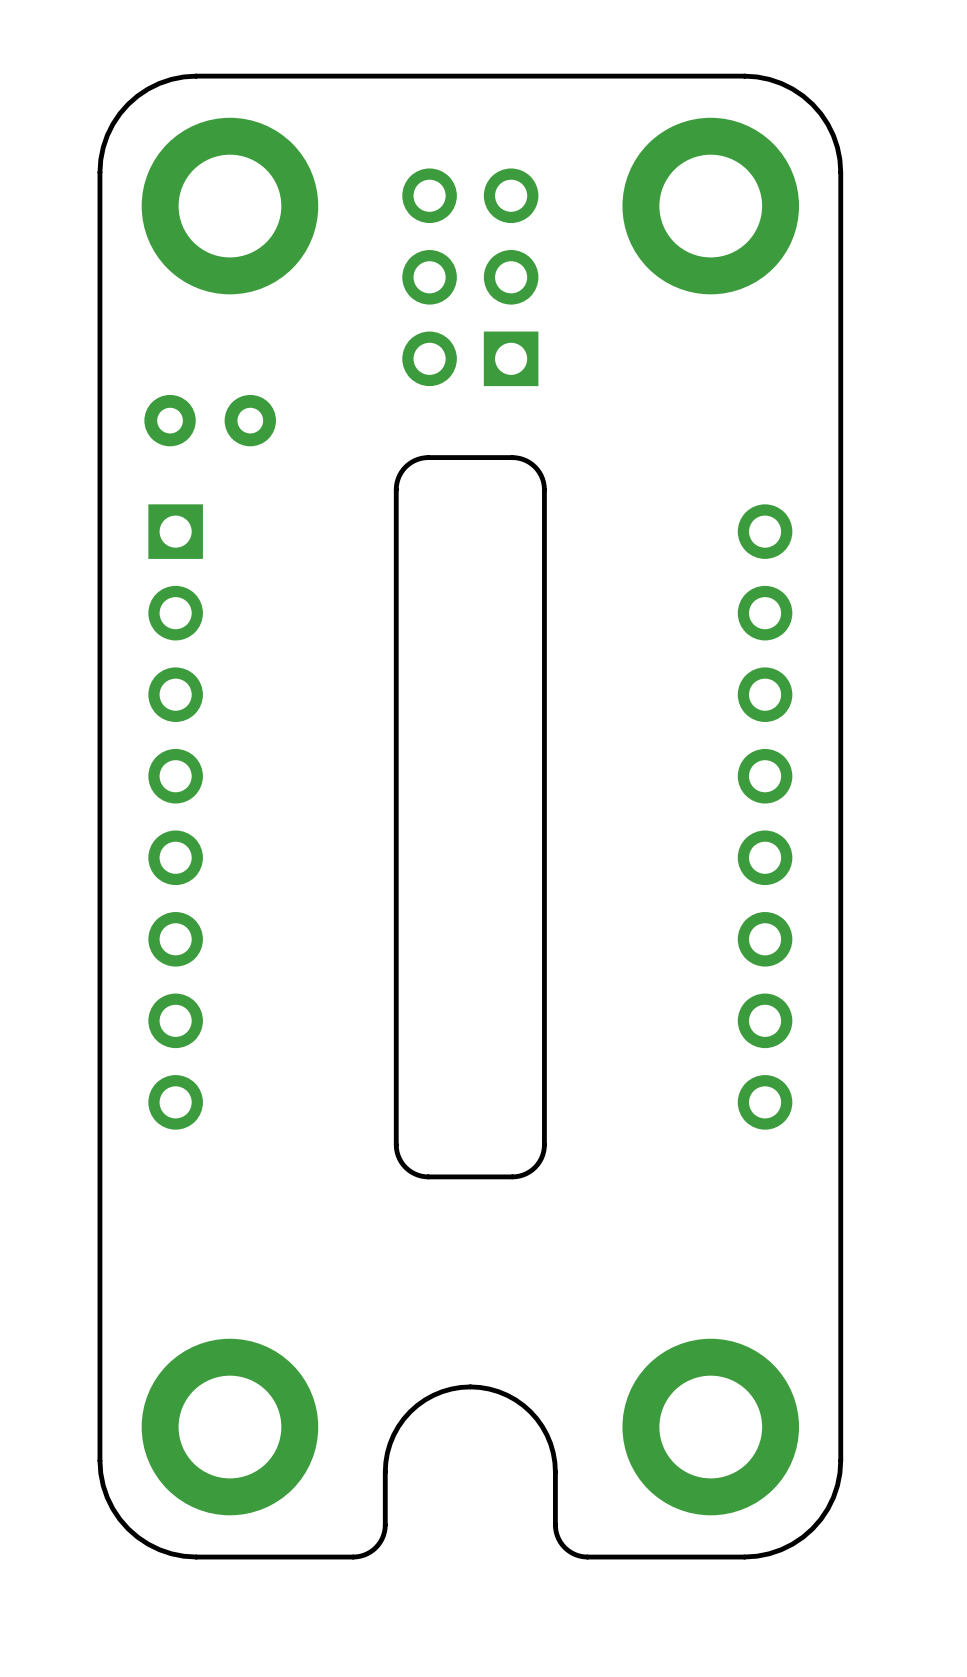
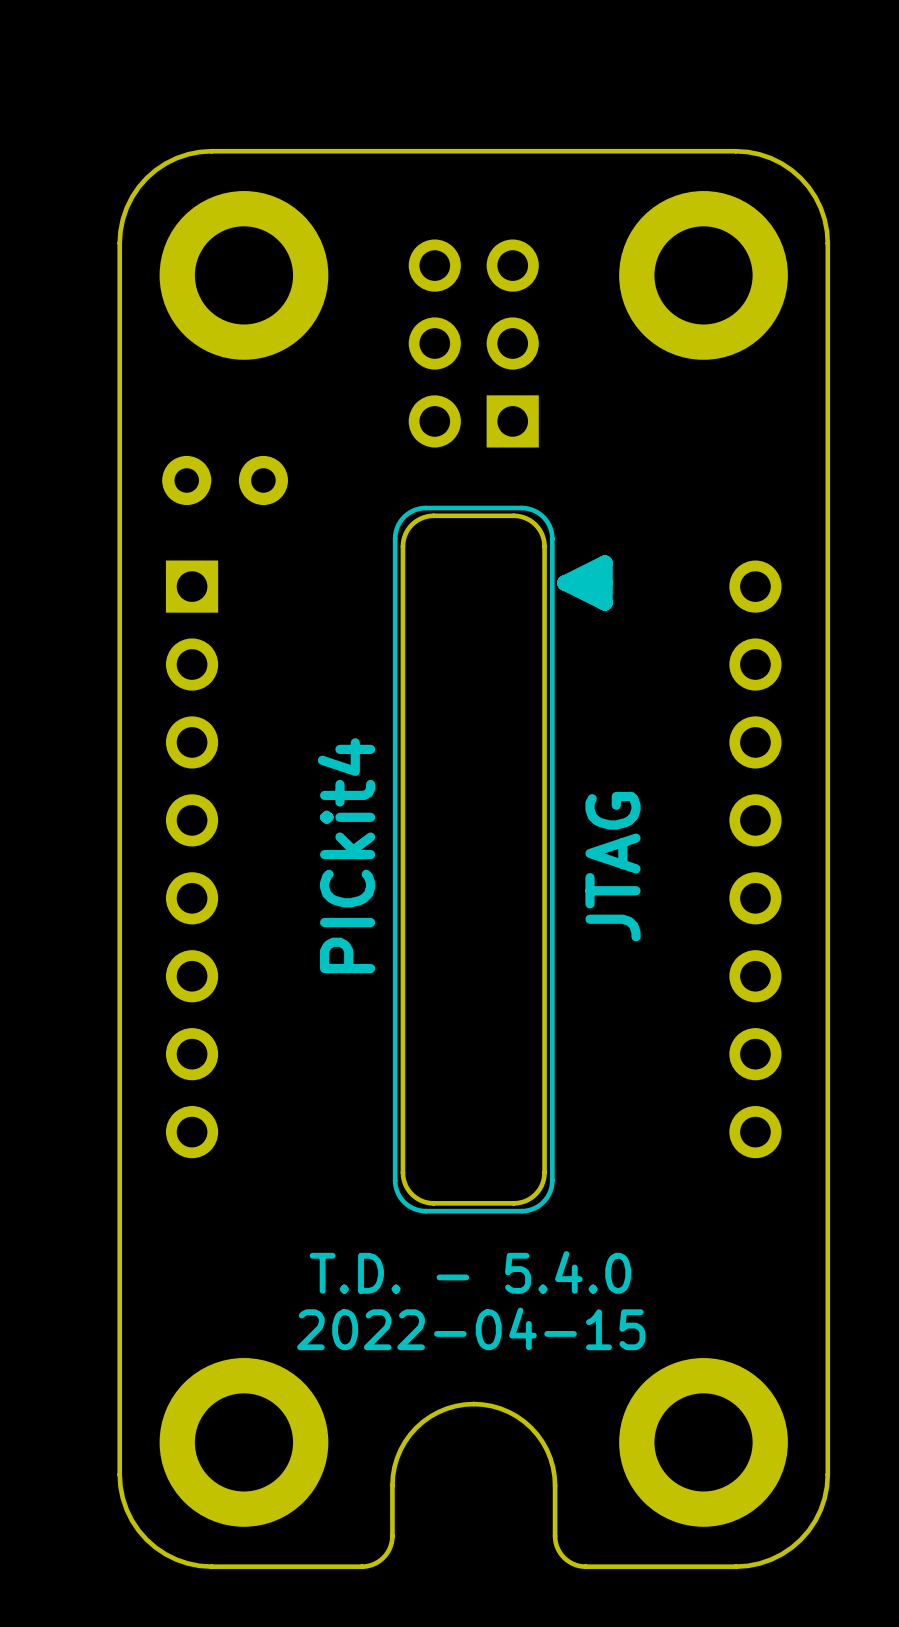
line: none -> (425, 508) (528, 508) (537, 512) (545, 519) (552, 535) (552, 1180) (550, 1190) (545, 1199) (534, 1208) (525, 1210) (418, 1210) (404, 1202) (398, 1193) (395, 1183) (395, 538) (398, 525) (404, 516) (415, 509) (425, 508)
drawing: none -> [557, 555, 613, 611]
text: none -> PICkit4 (346, 855)
text: none -> JTAG (613, 866)
text: none -> T.D. - 5.4.0 (470, 1272)
text: none -> 2022-04-15 (471, 1328)

